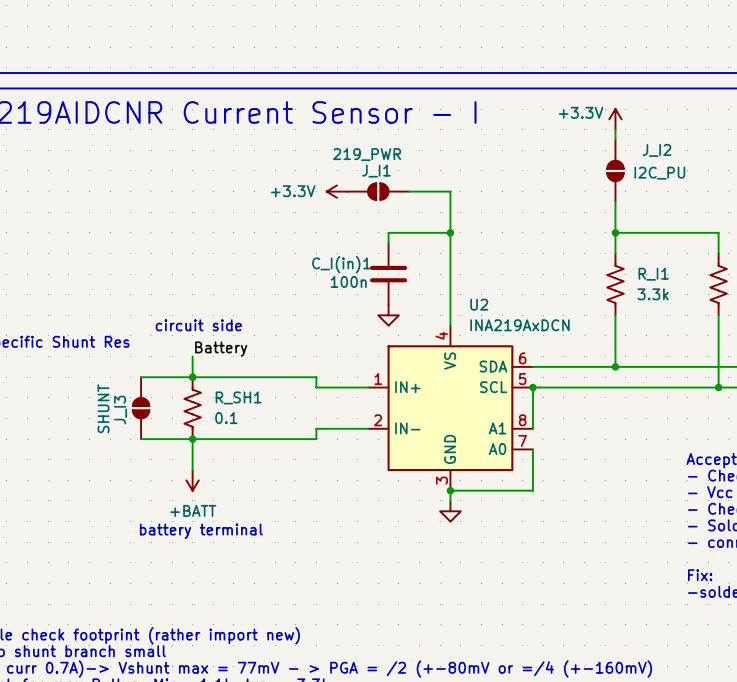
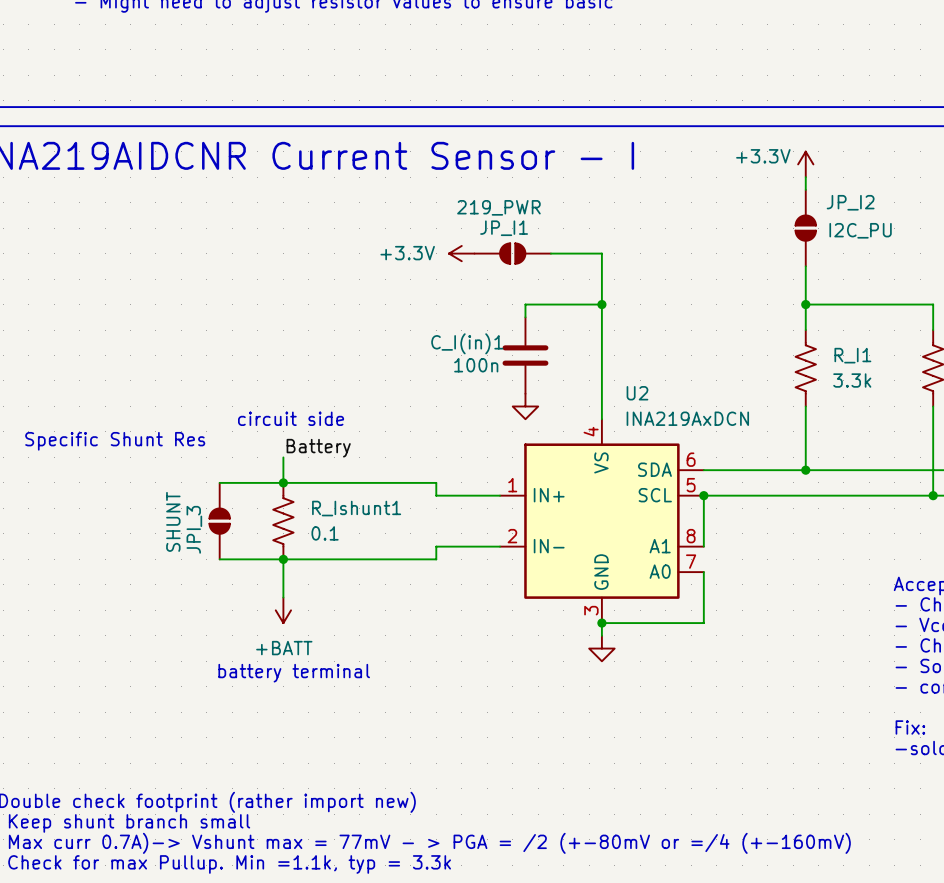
J_I2 name: J_I2 (656, 150) -> JP_I2 (850, 202)
J_I1 name: J_I1 (376, 171) -> JP_I1 (504, 228)
R_SH1 name: R_SH1 (238, 397) -> R_Ishunt1 (356, 508)
J_I3 name: J_I3 (120, 410) -> JPI_3 (194, 529)

